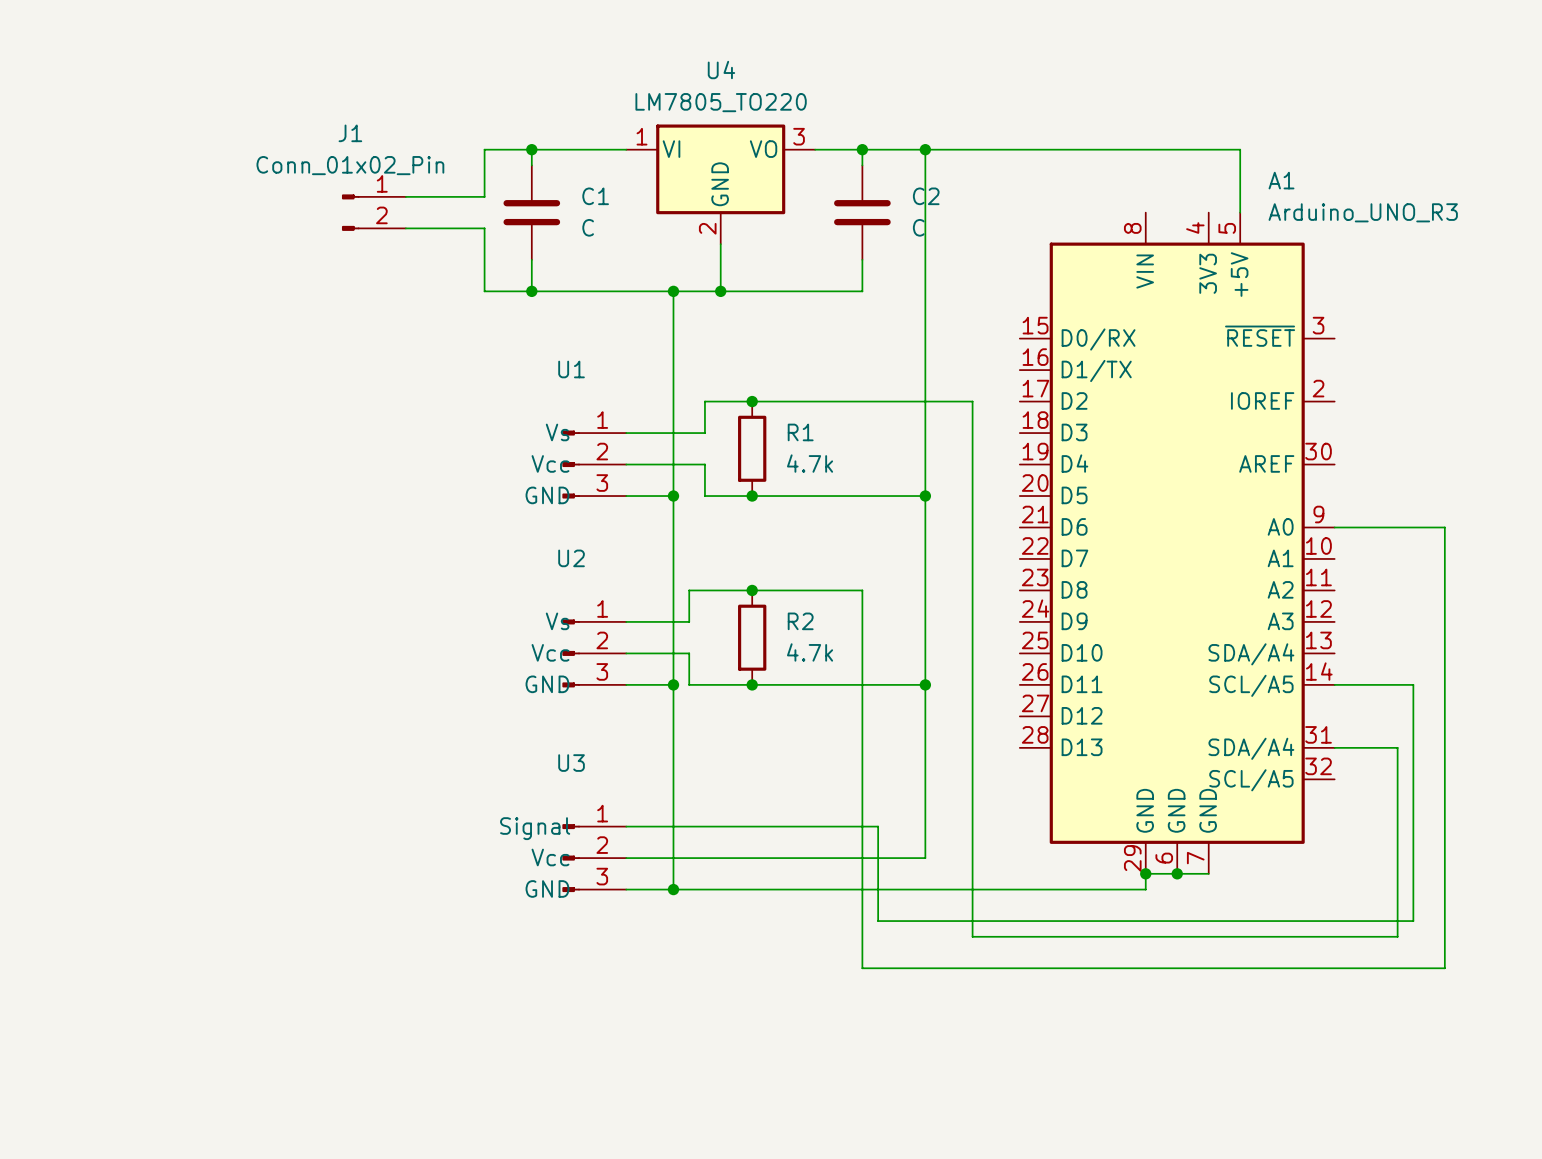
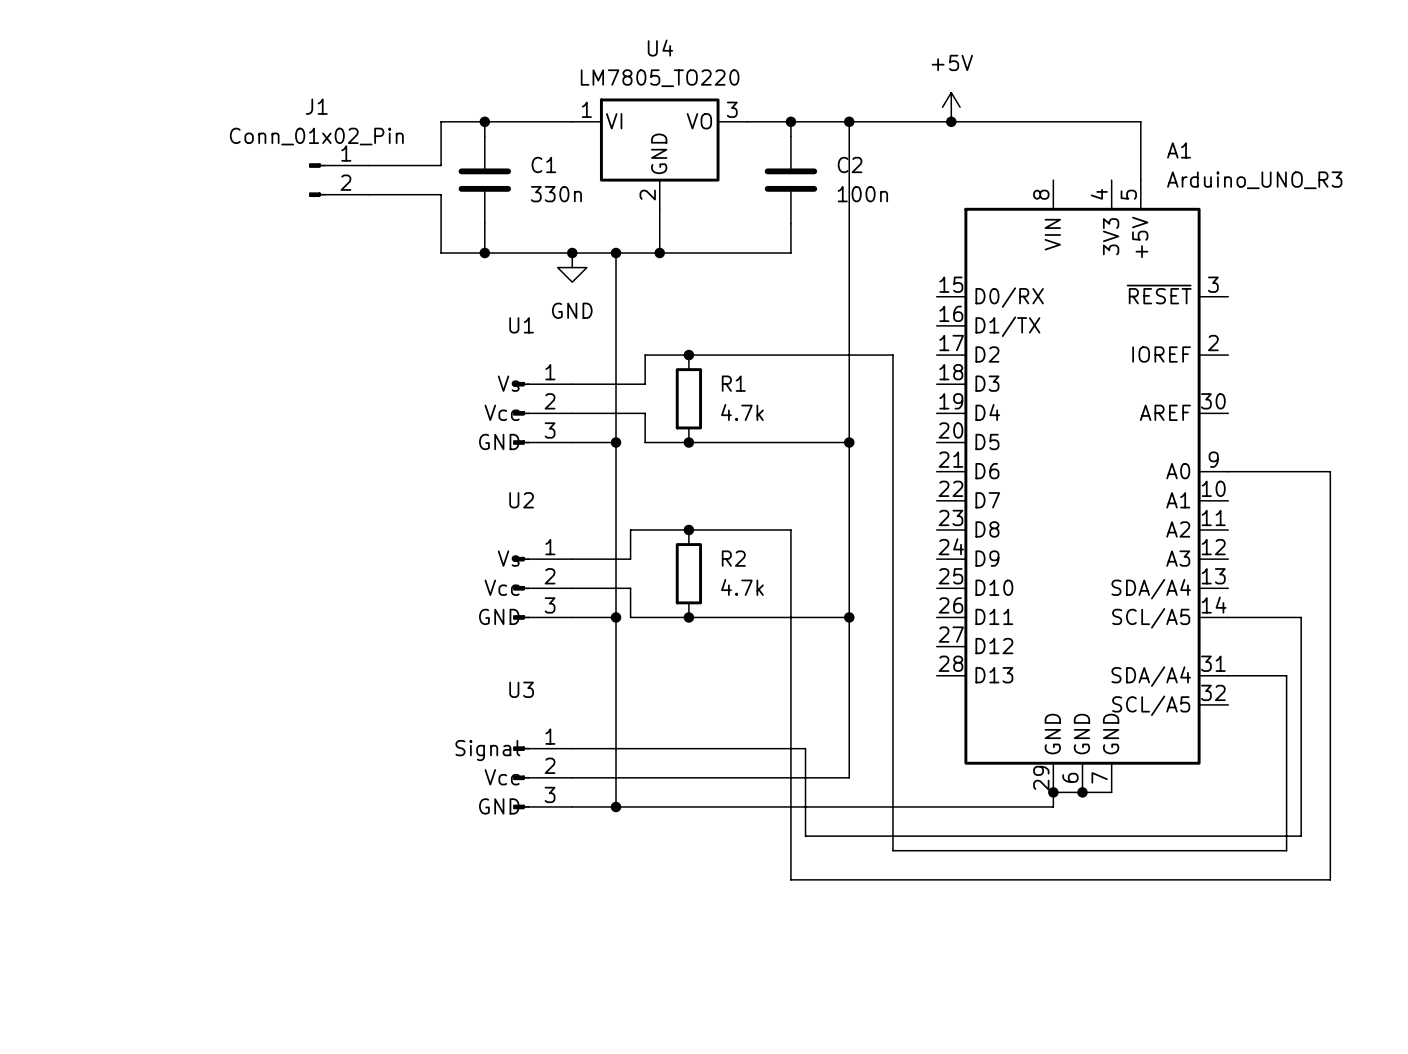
power symbol: none -> +5V (951, 107)
junction: none -> (951, 121)
C1 value: C (588, 227) -> 330n (556, 194)
C2 value: C (918, 227) -> 100n (862, 194)
junction: none -> (572, 253)
power symbol: none -> GND (572, 267)

